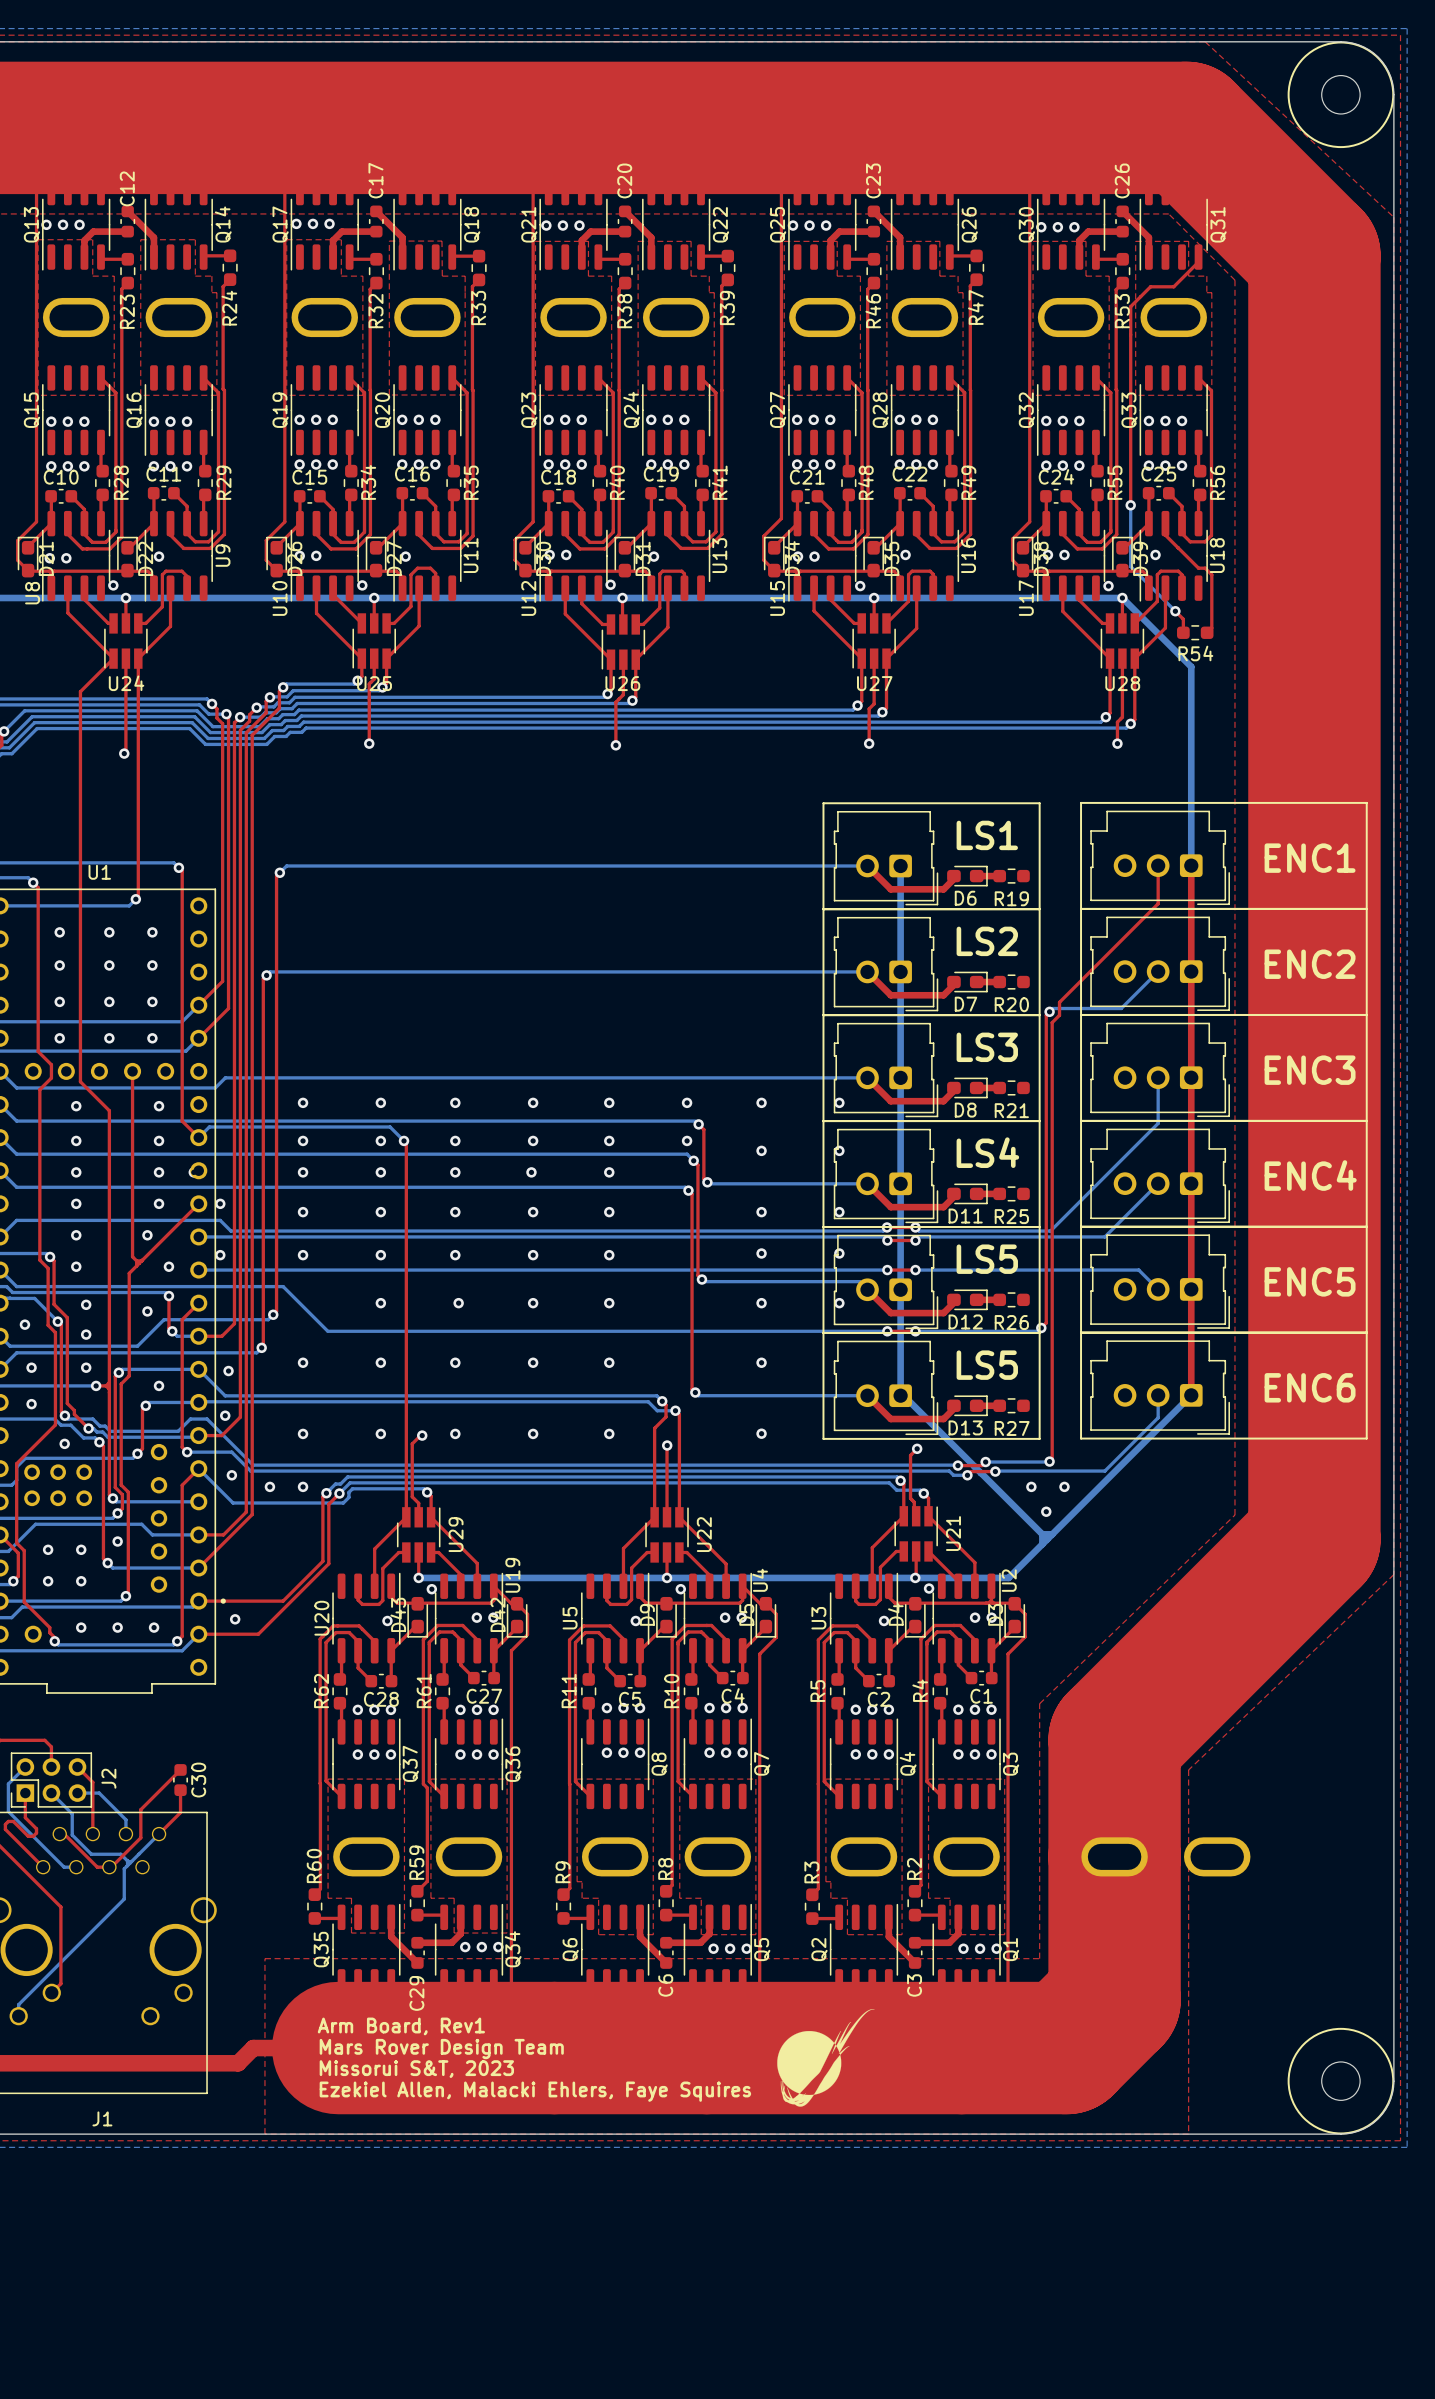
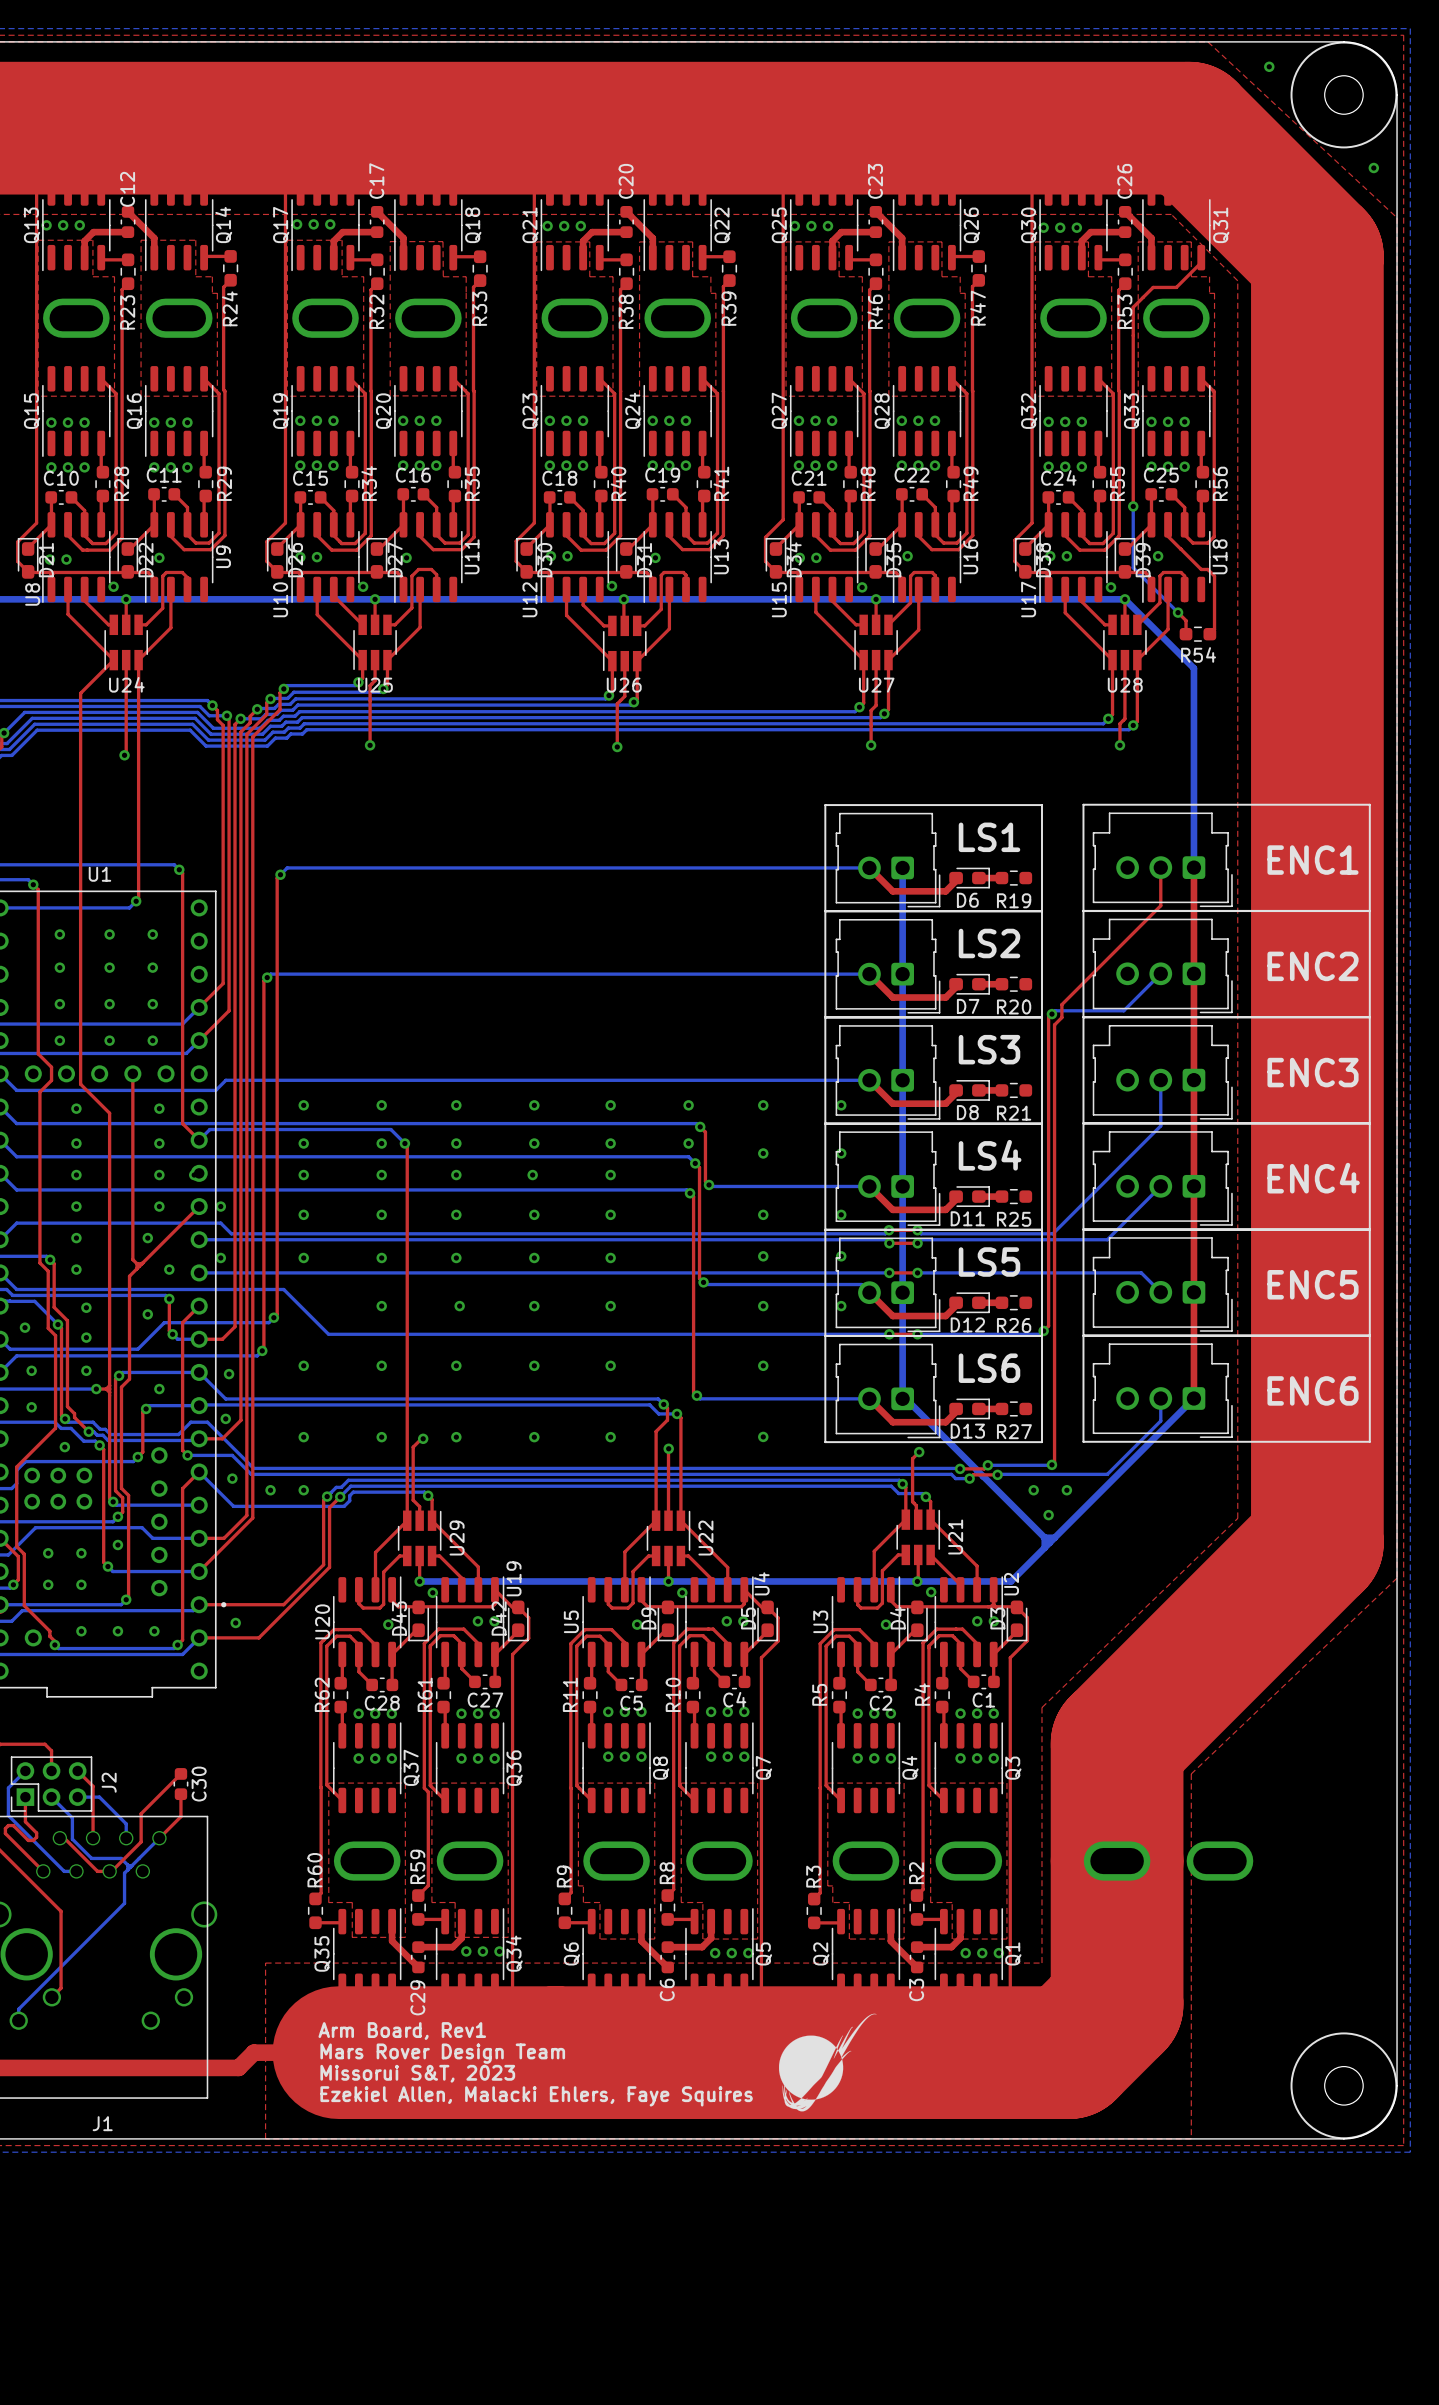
via: none -> (1269, 66)
via: none -> (1373, 167)
text: LS5 (987, 1365) -> LS6 (989, 1368)

